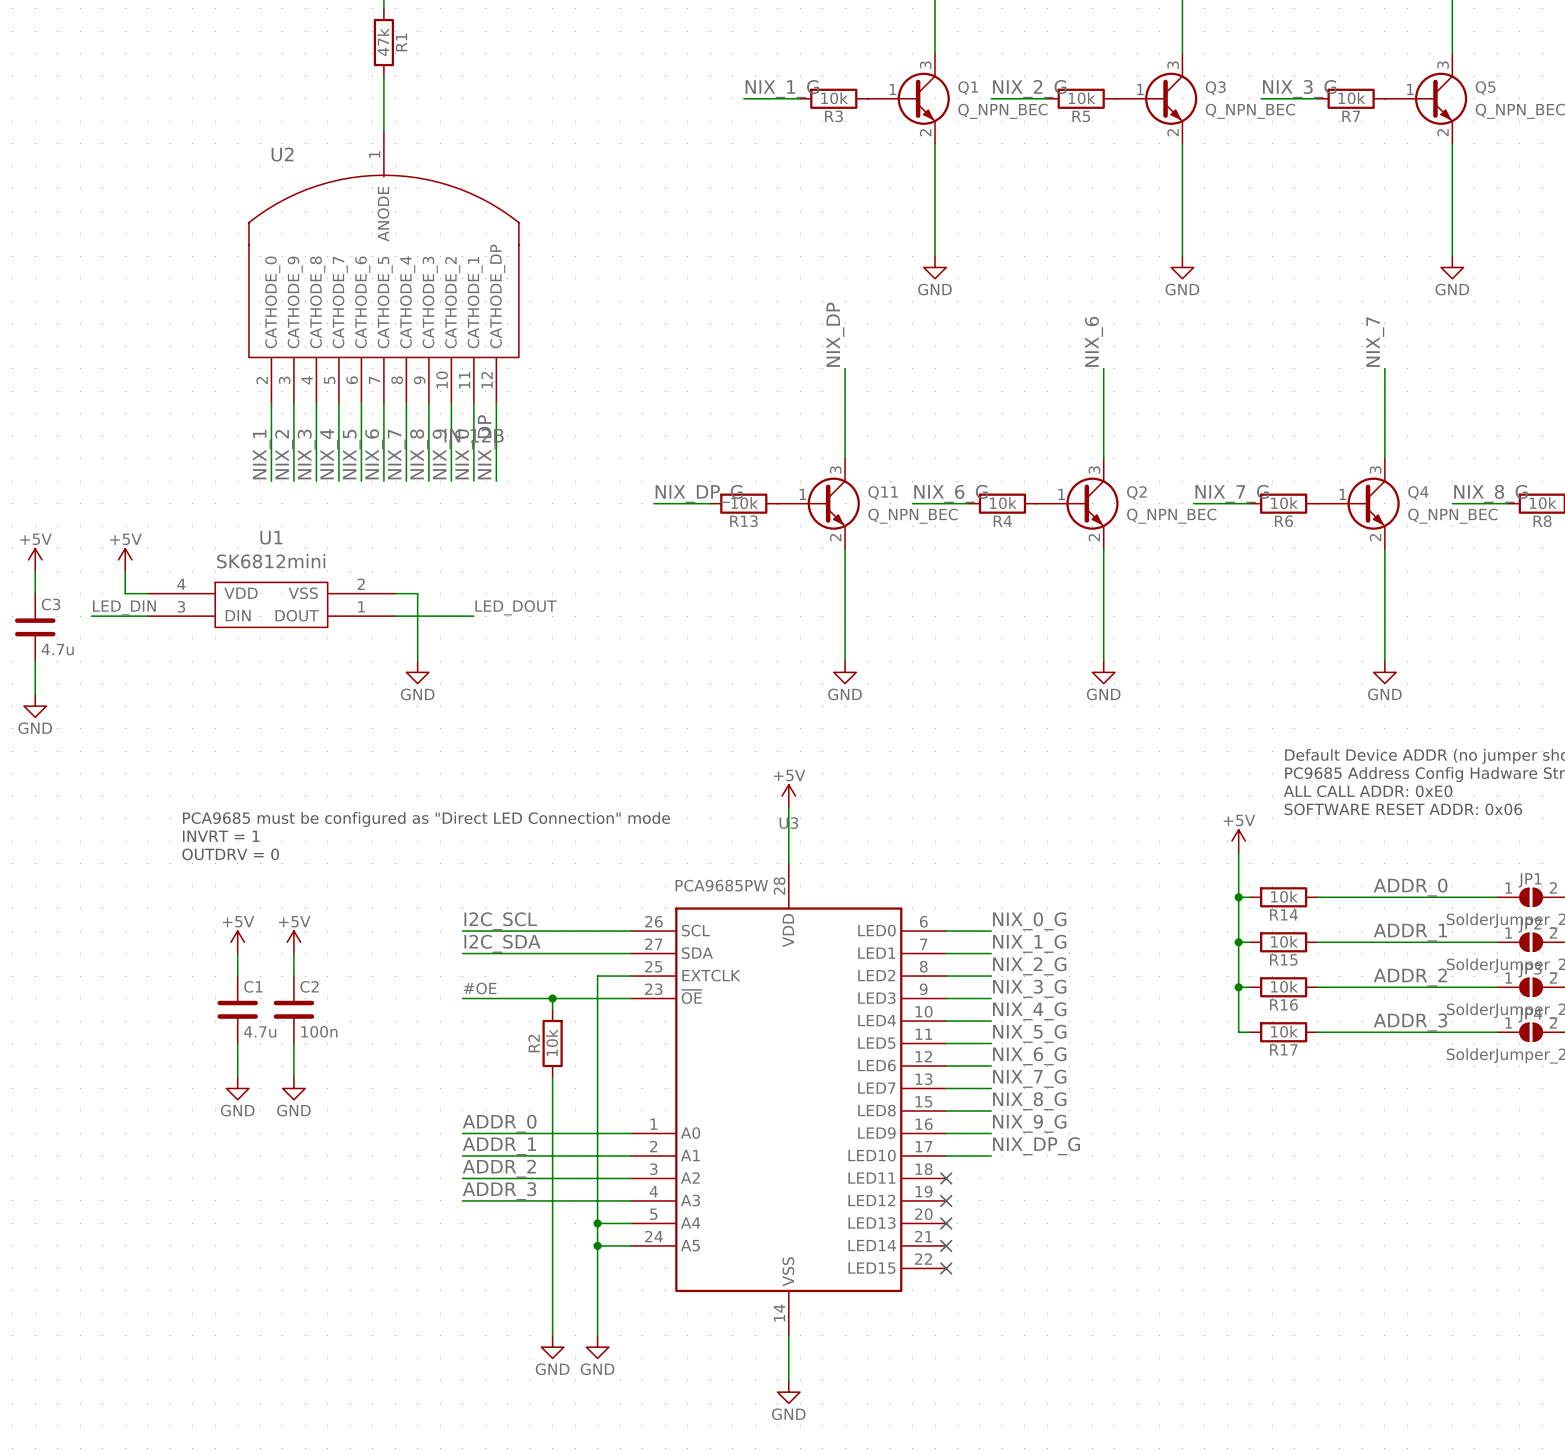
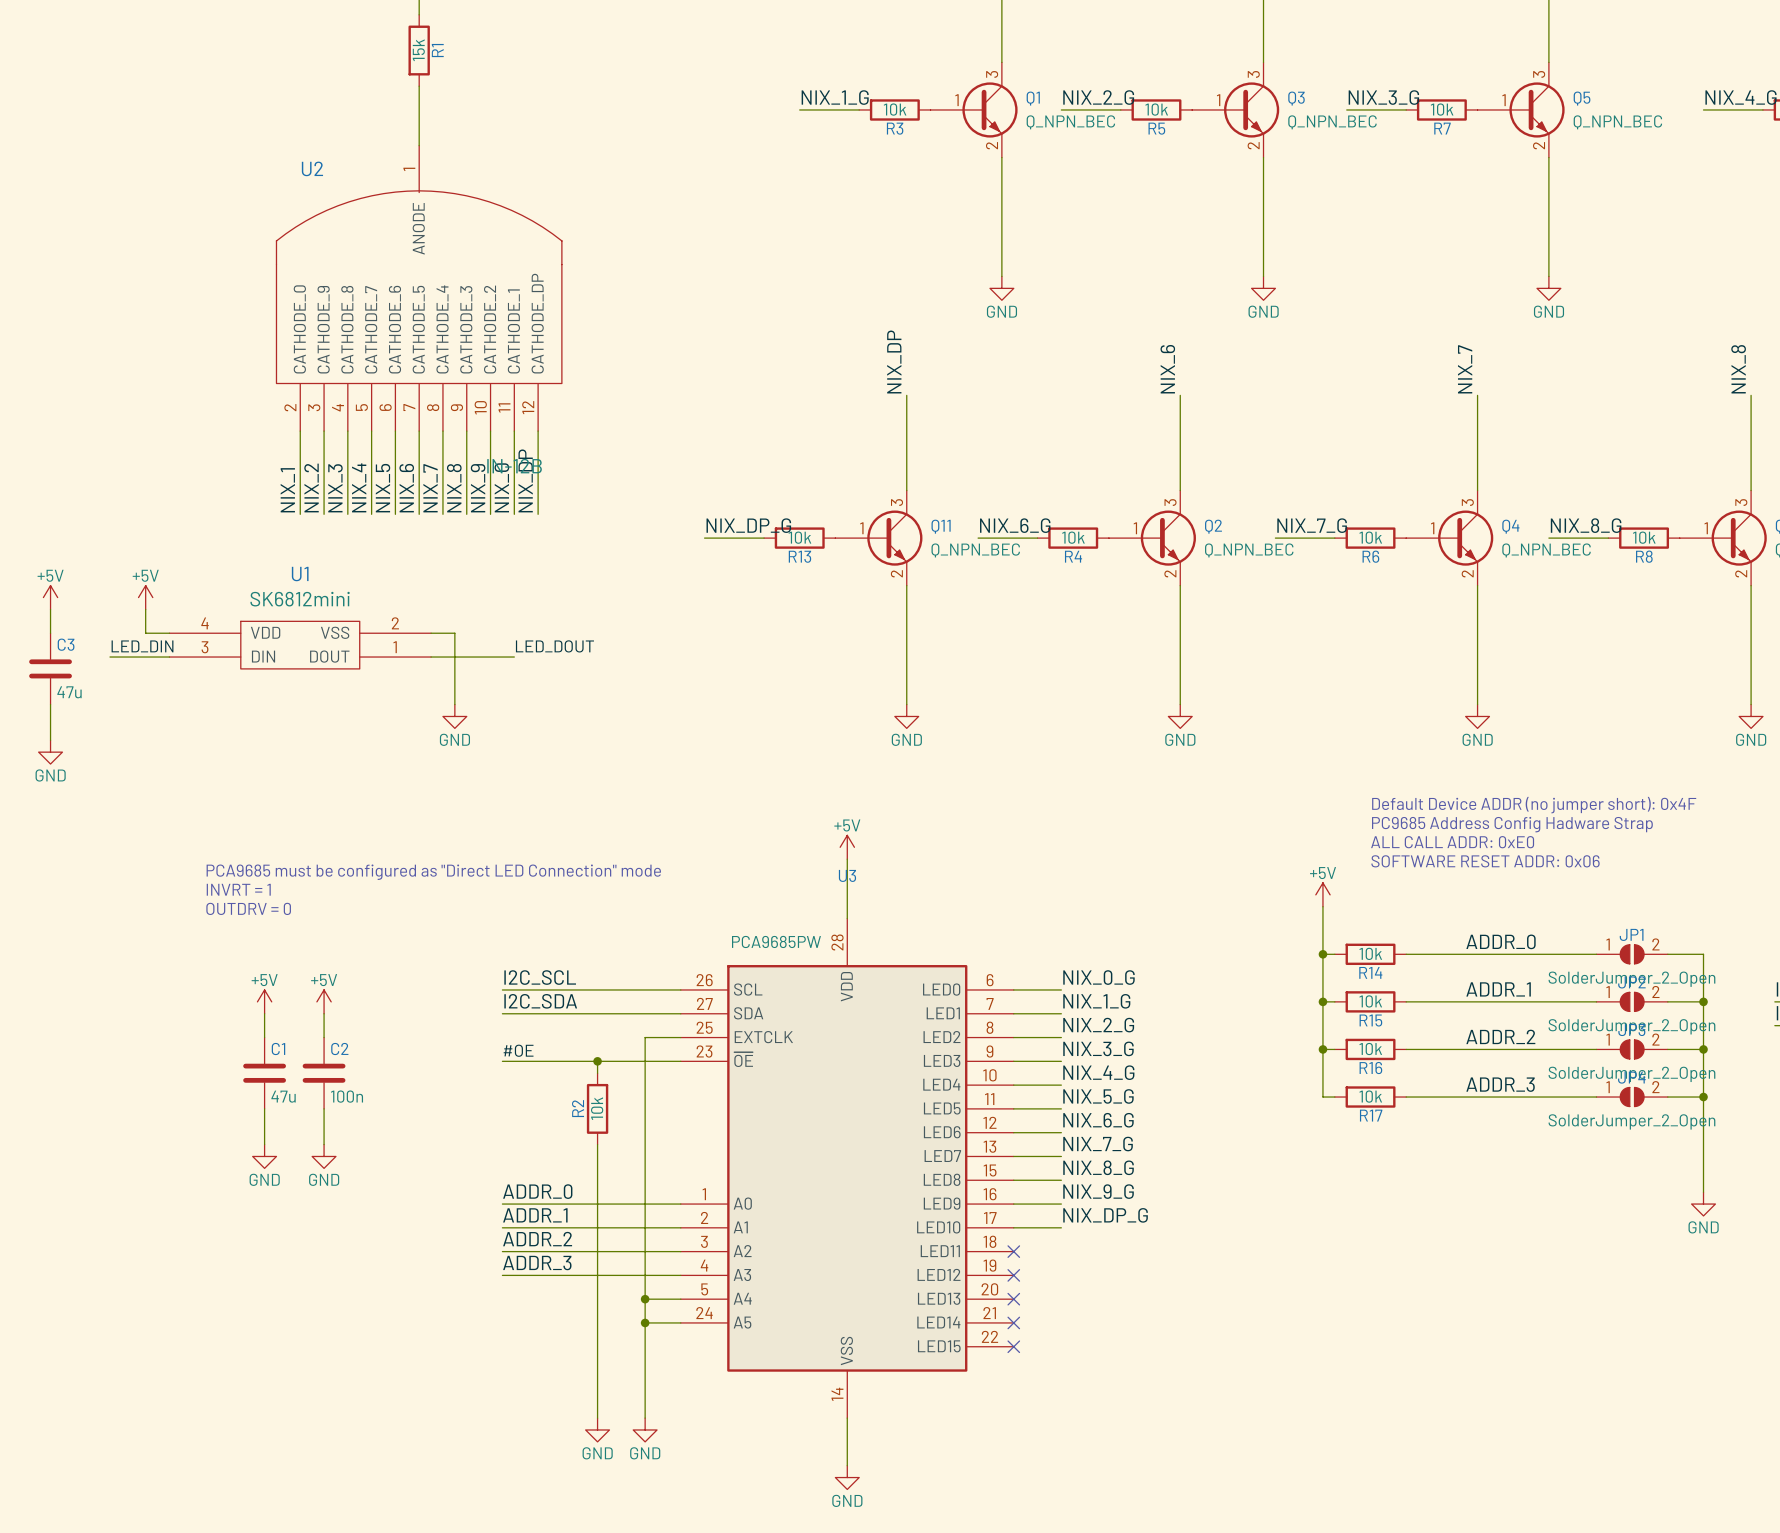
R1 value: 47k (383, 42) -> 15k (418, 50)
C3 value: 4.7u (57, 649) -> 47u (69, 692)
C1 value: 4.7u (260, 1031) -> 47u (283, 1096)

